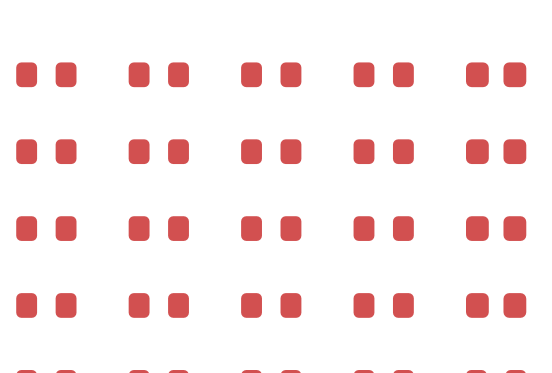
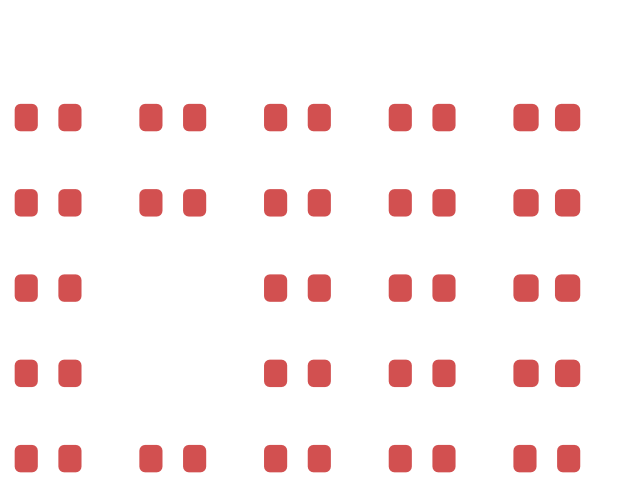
part: (158, 228) -> none
part: (158, 305) -> none

